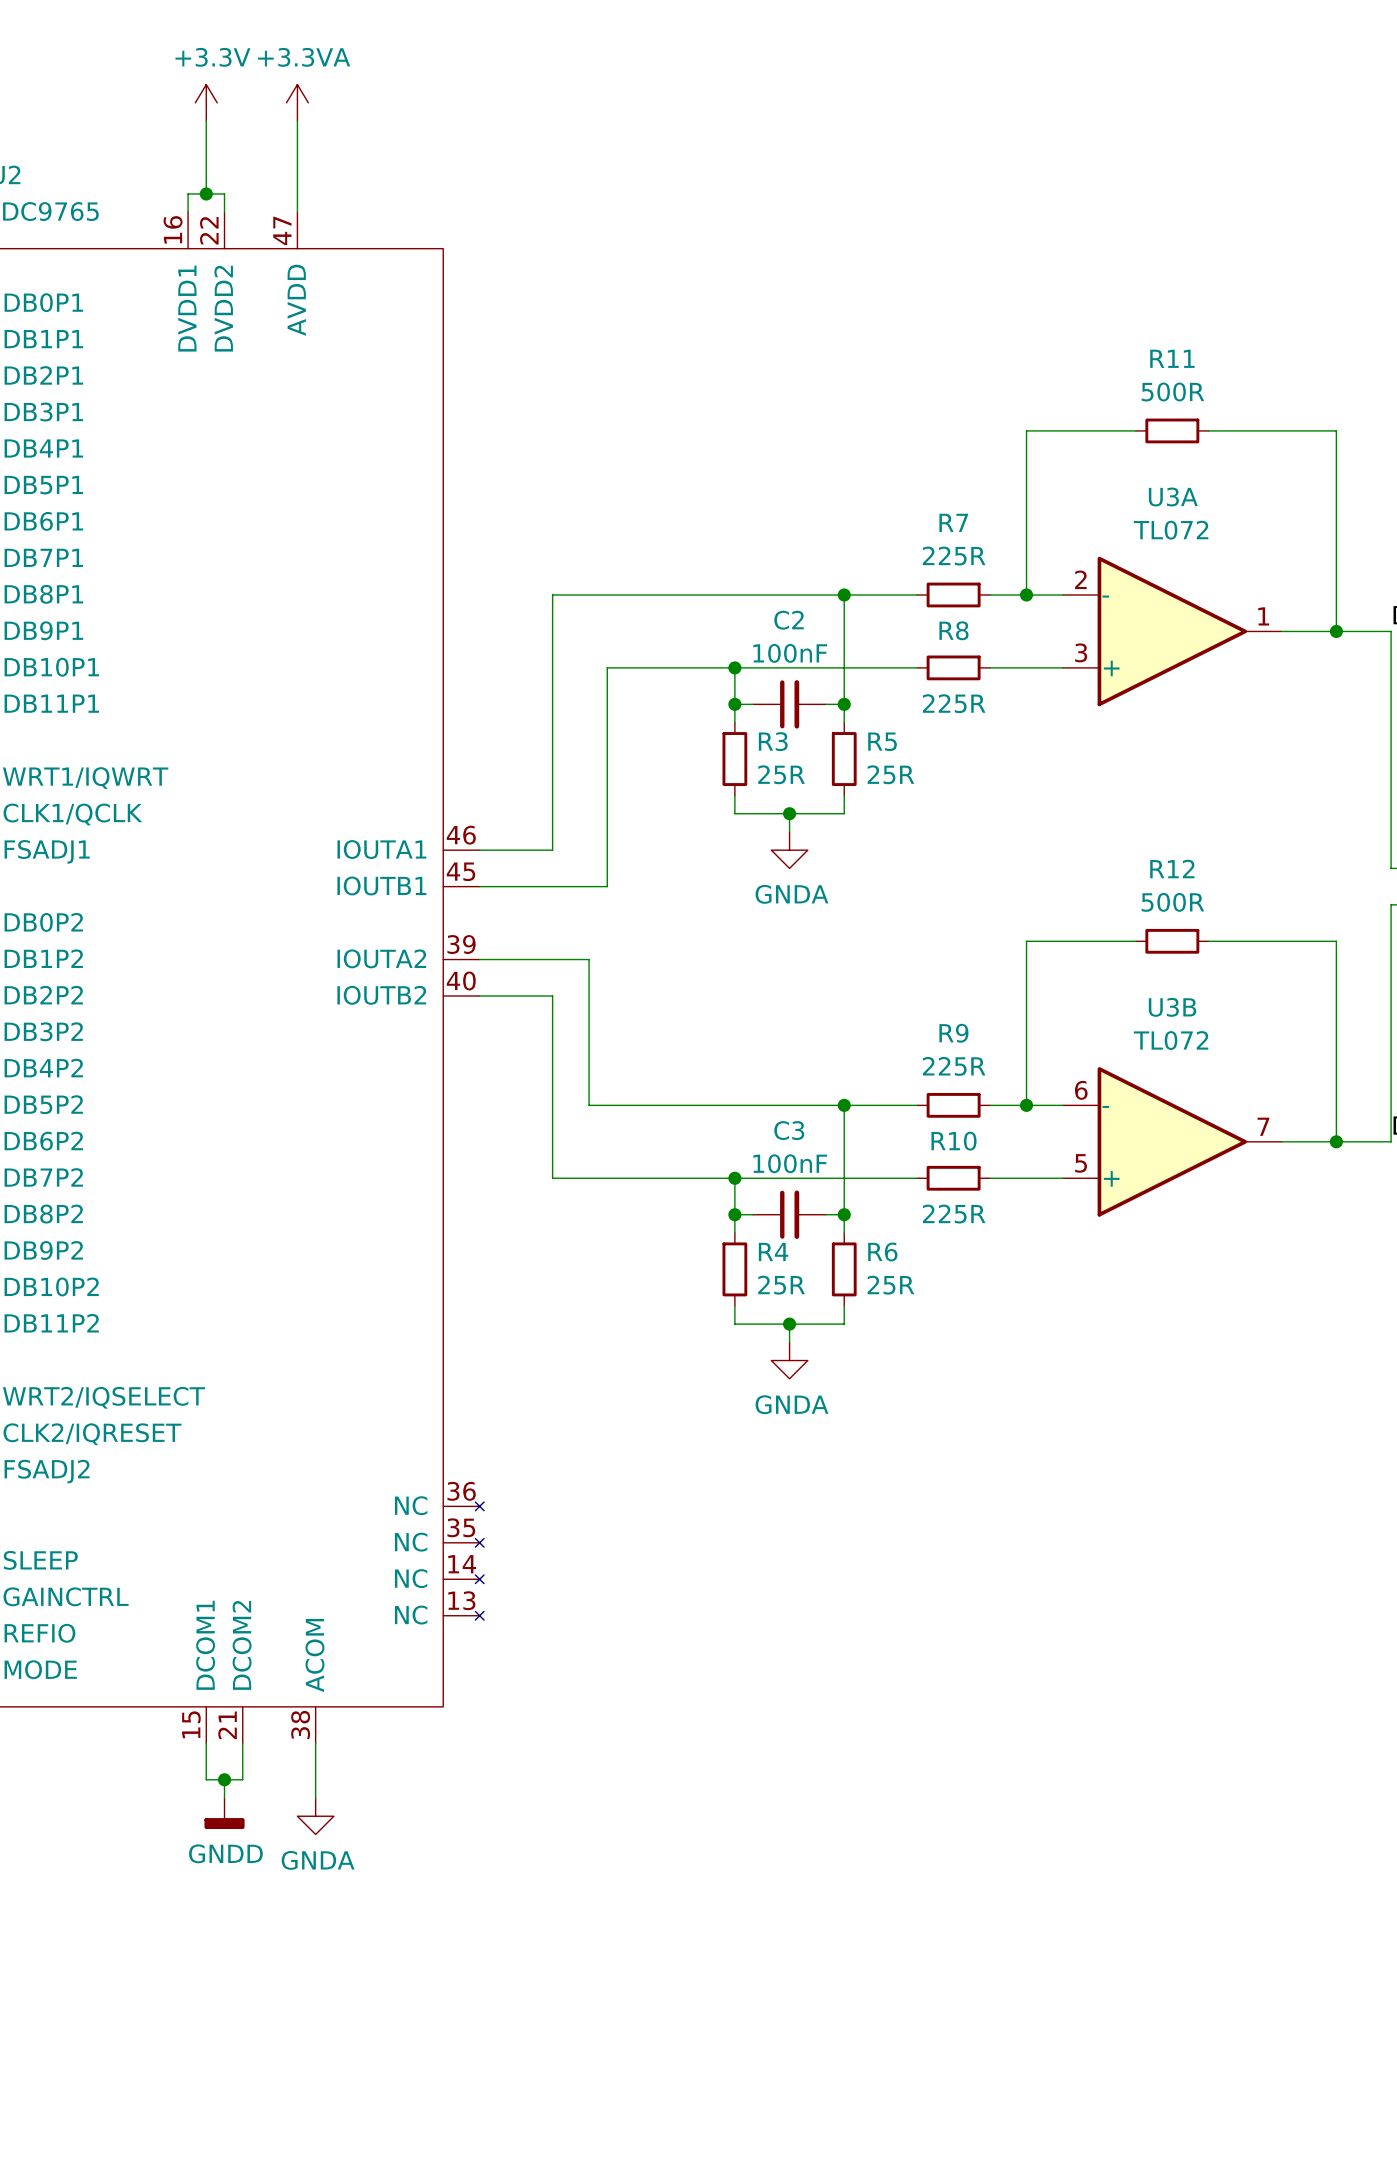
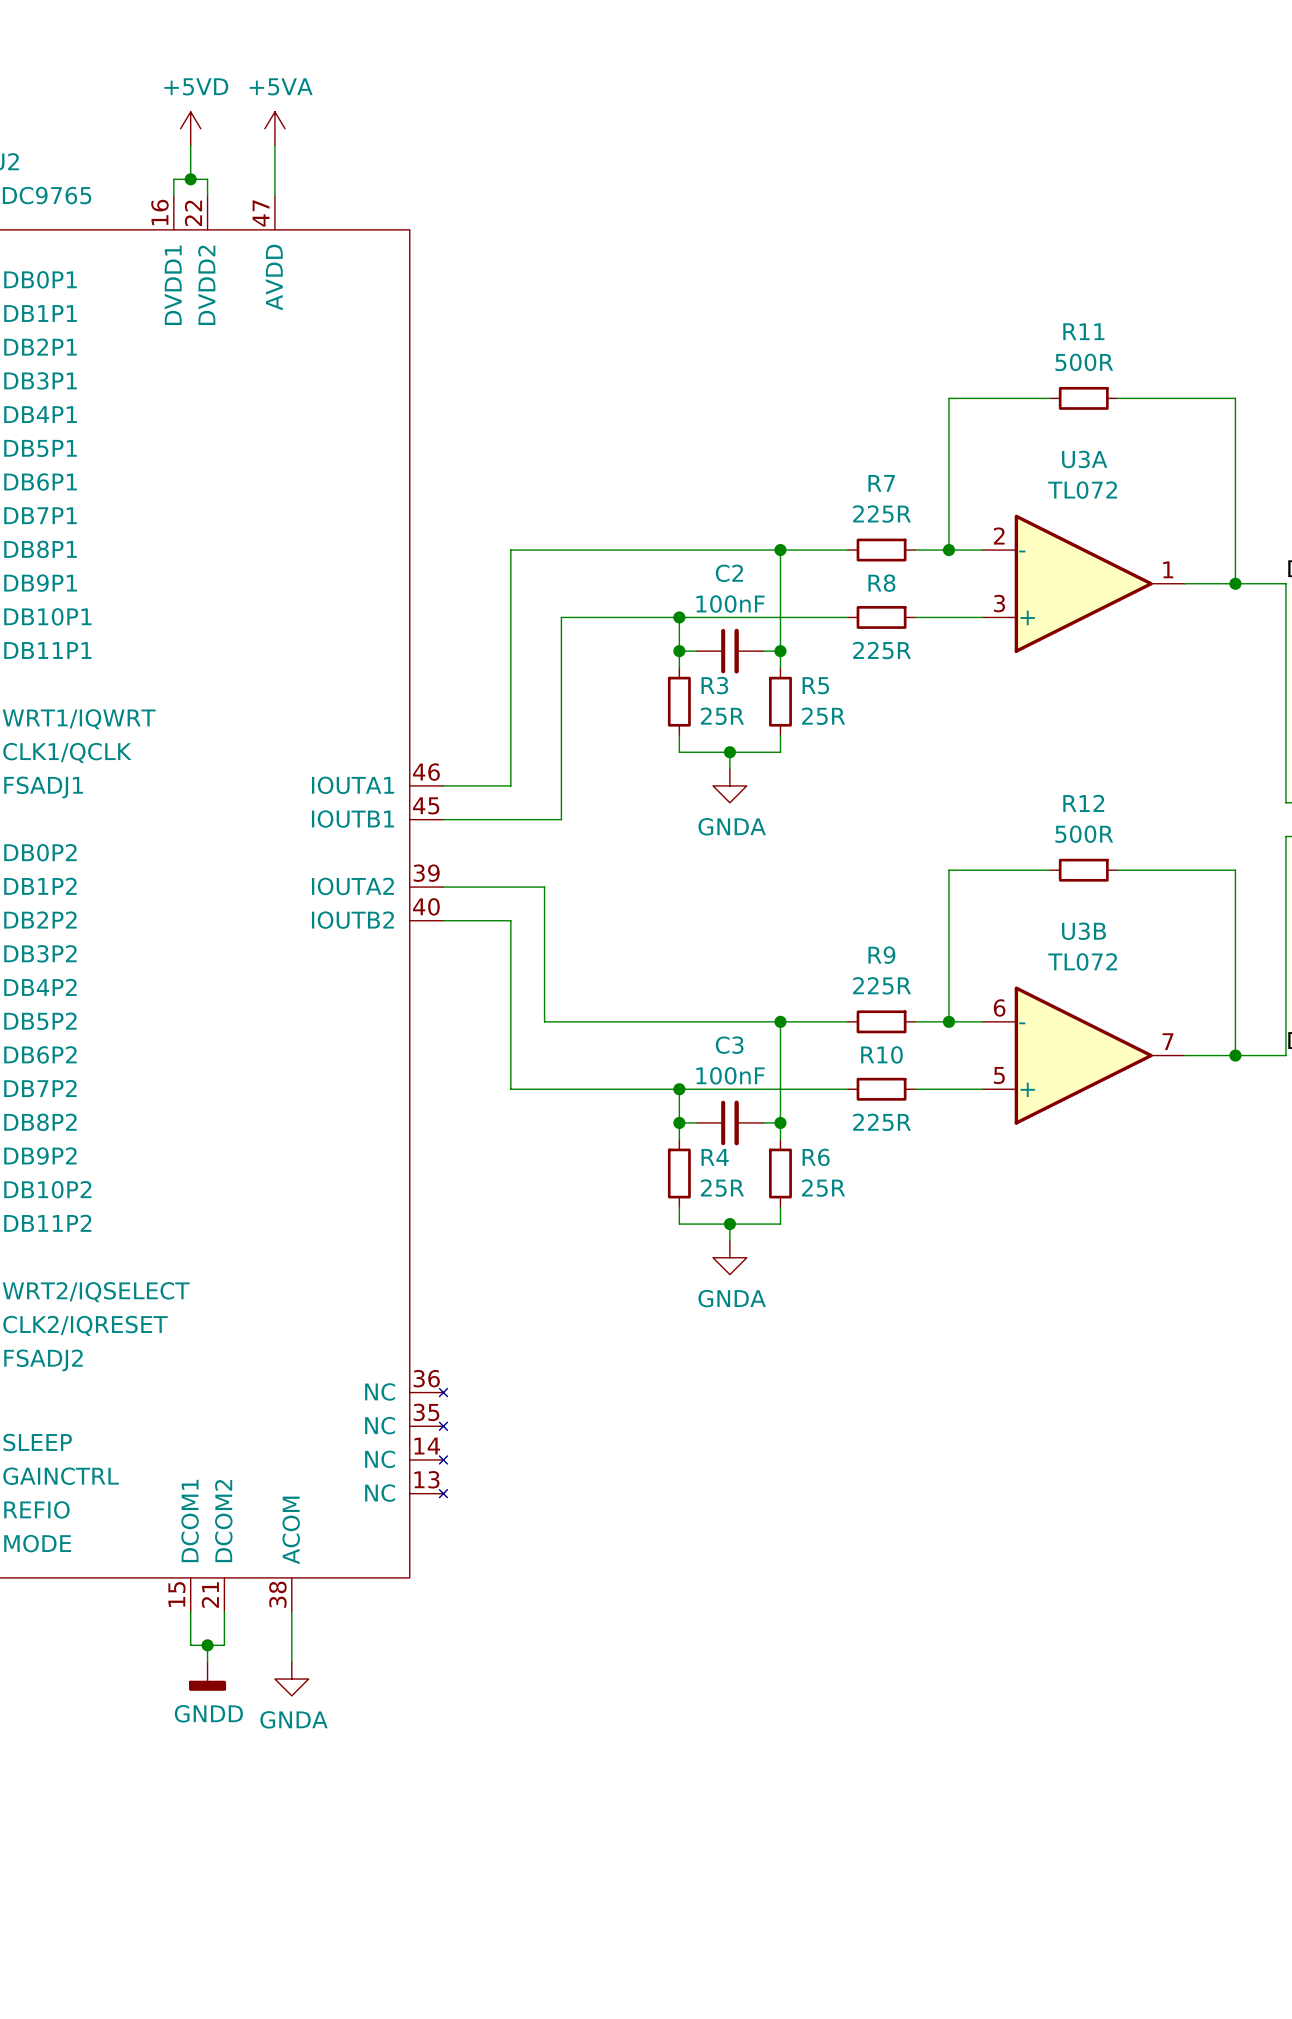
power symbol: +3.3V (206, 102) -> none
power symbol: +3.3VA (297, 102) -> none
power symbol: none -> +5VD (190, 128)
power symbol: none -> +5VA (274, 128)

